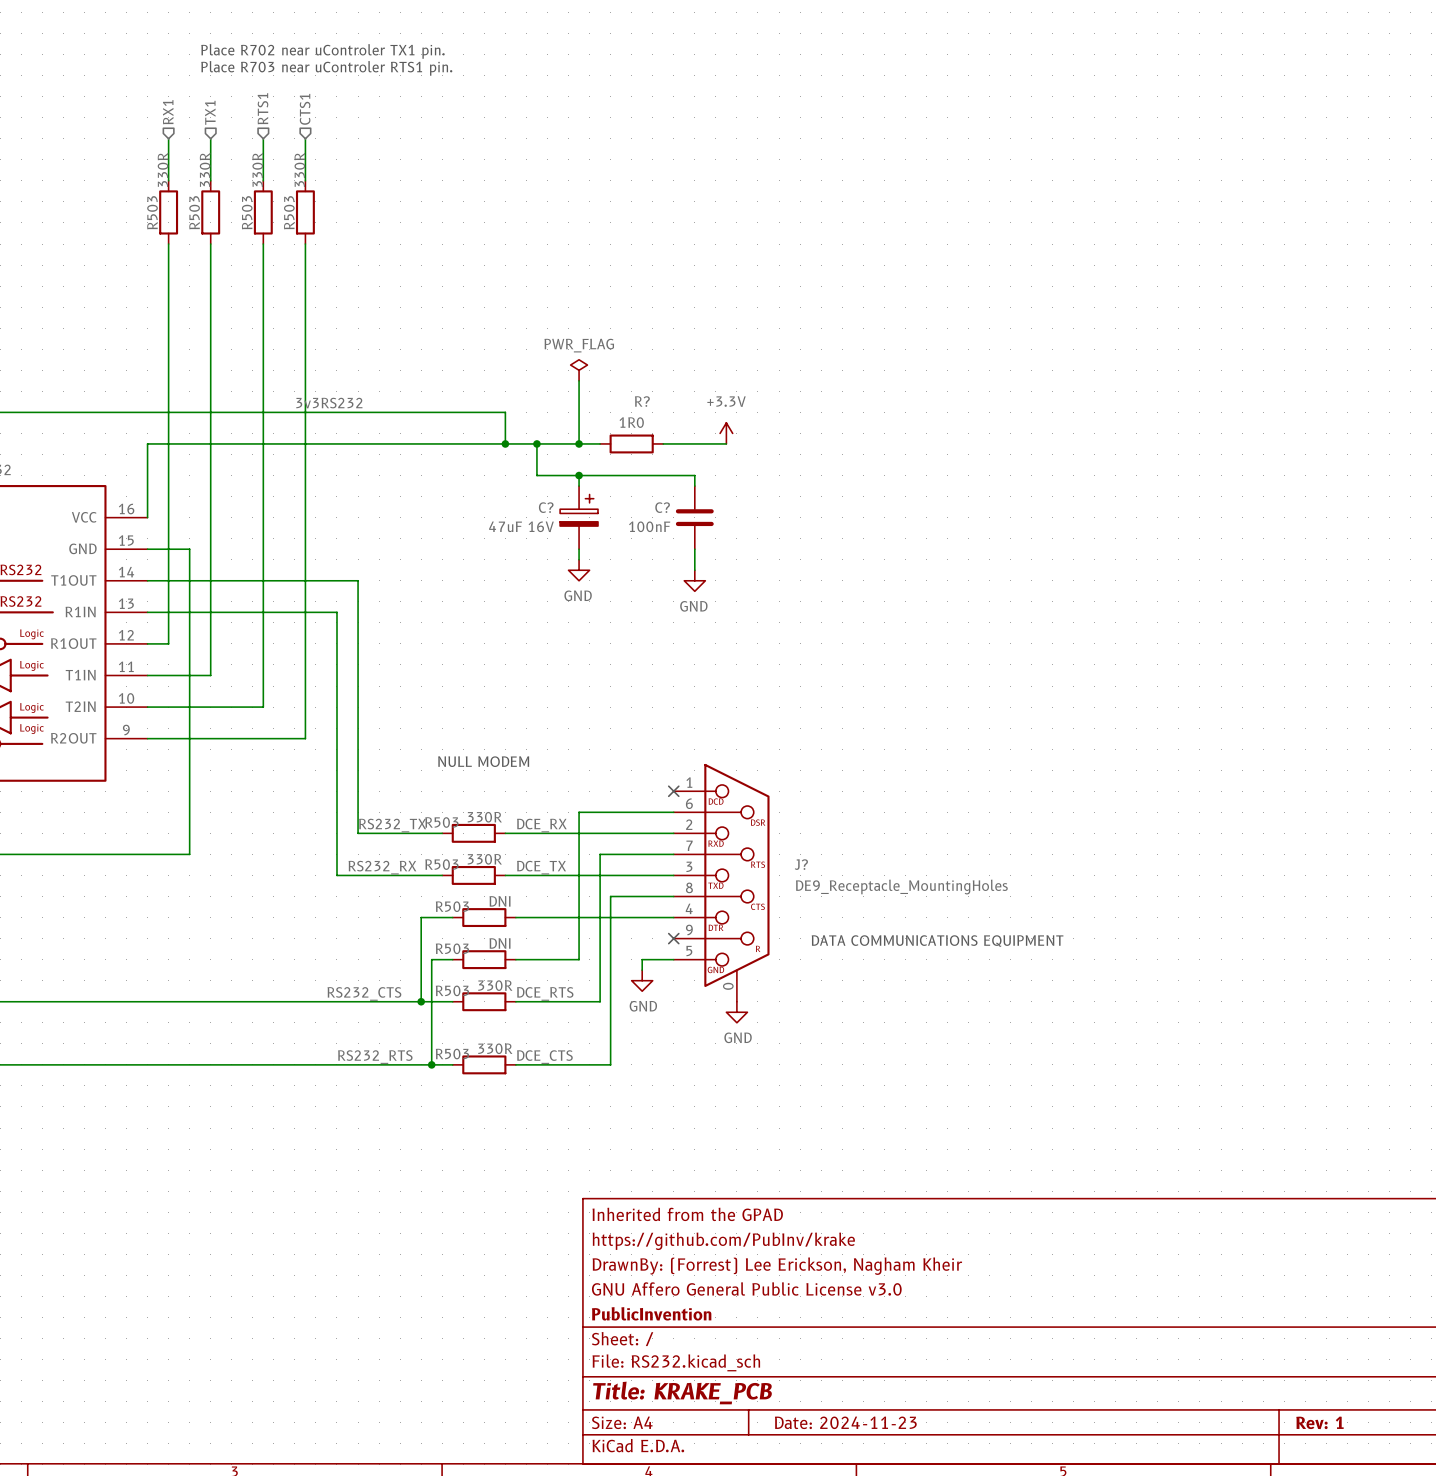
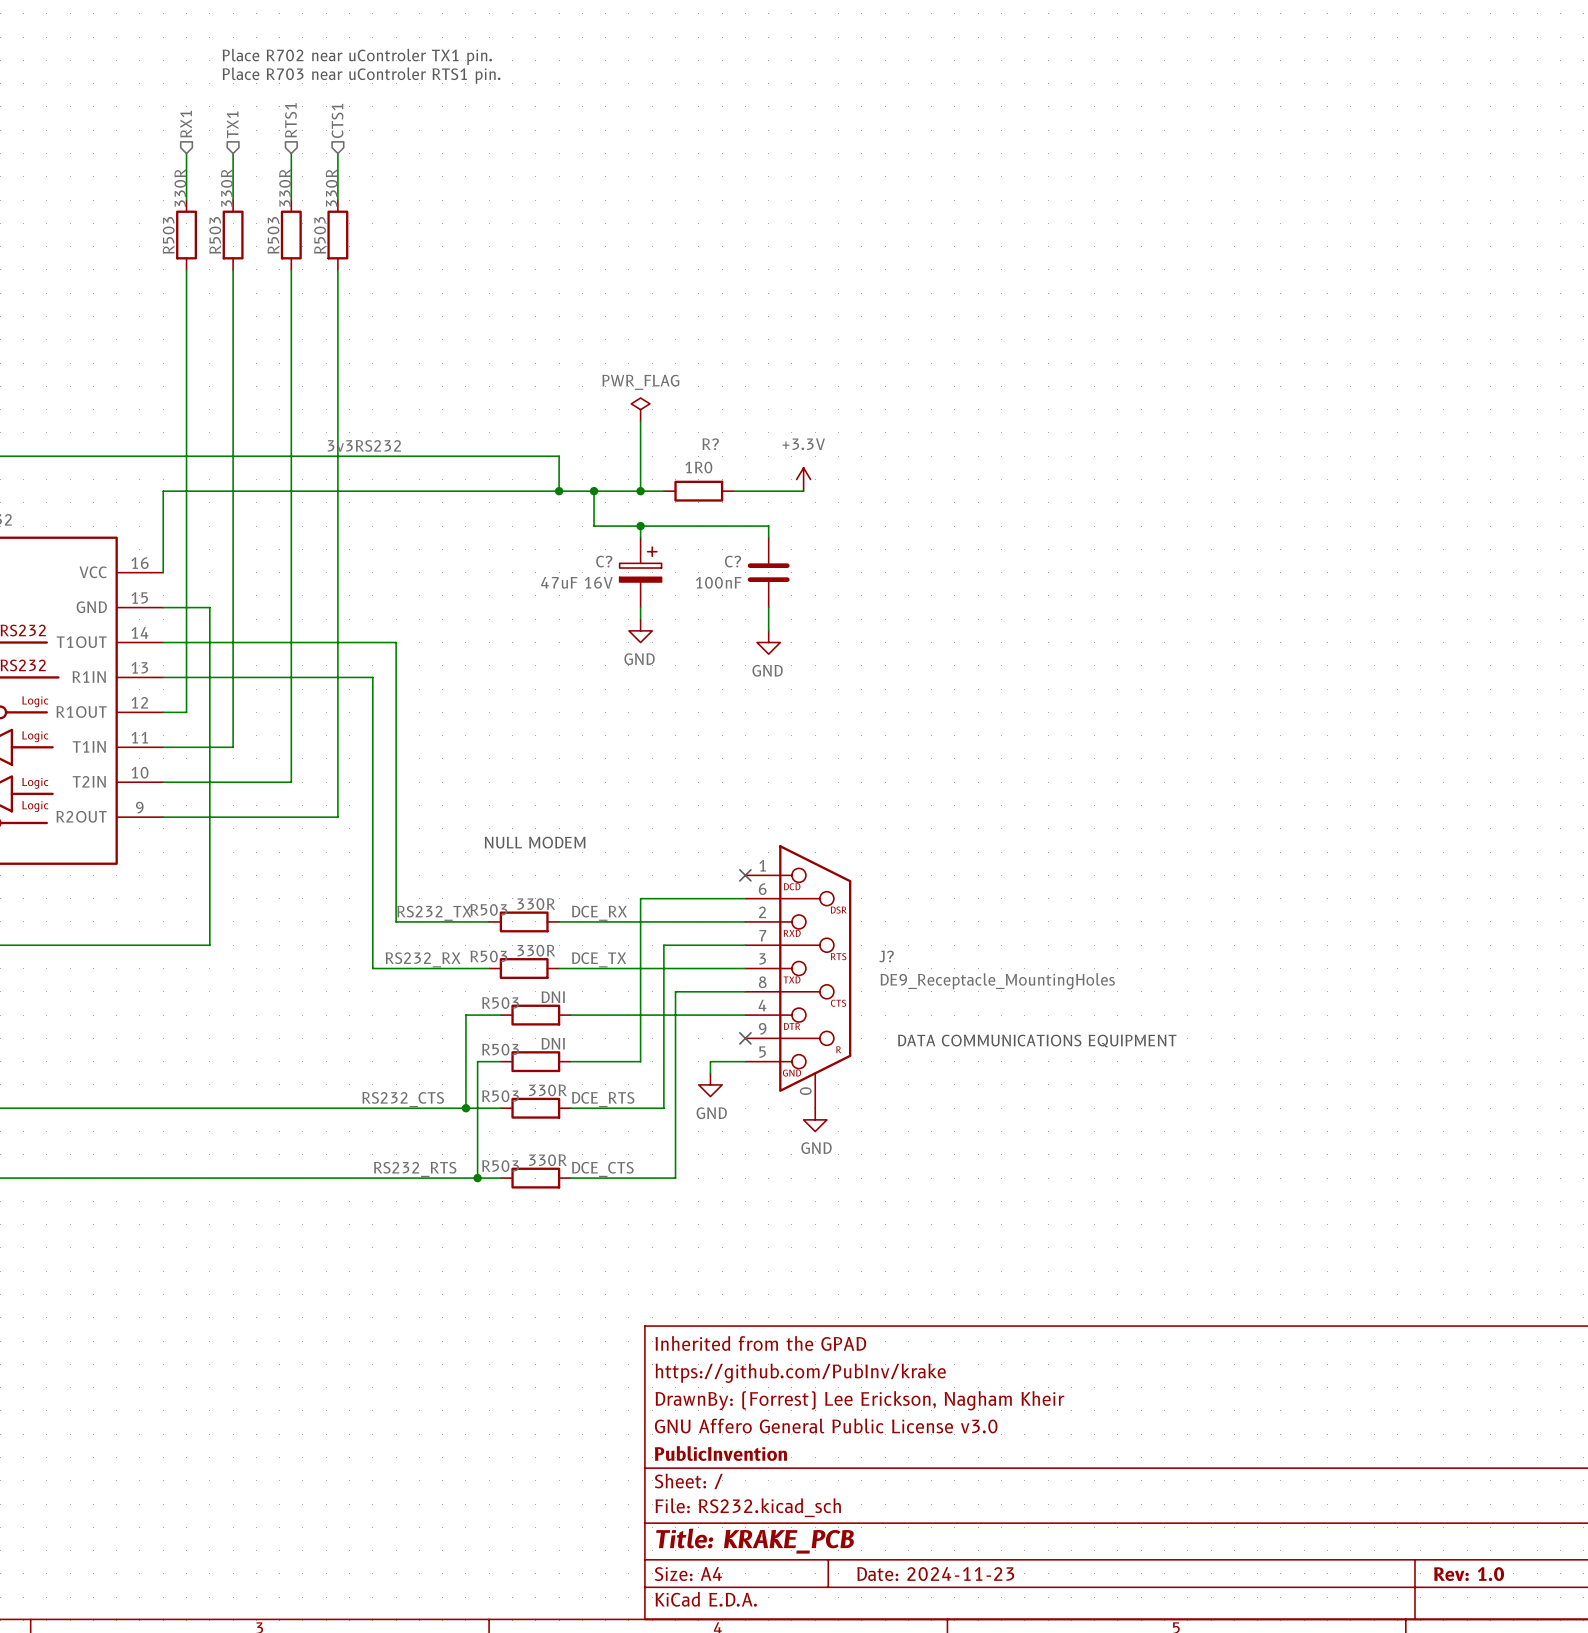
title block: Rev: 1 (1319, 1422) -> Rev: 1.0 (1469, 1574)

